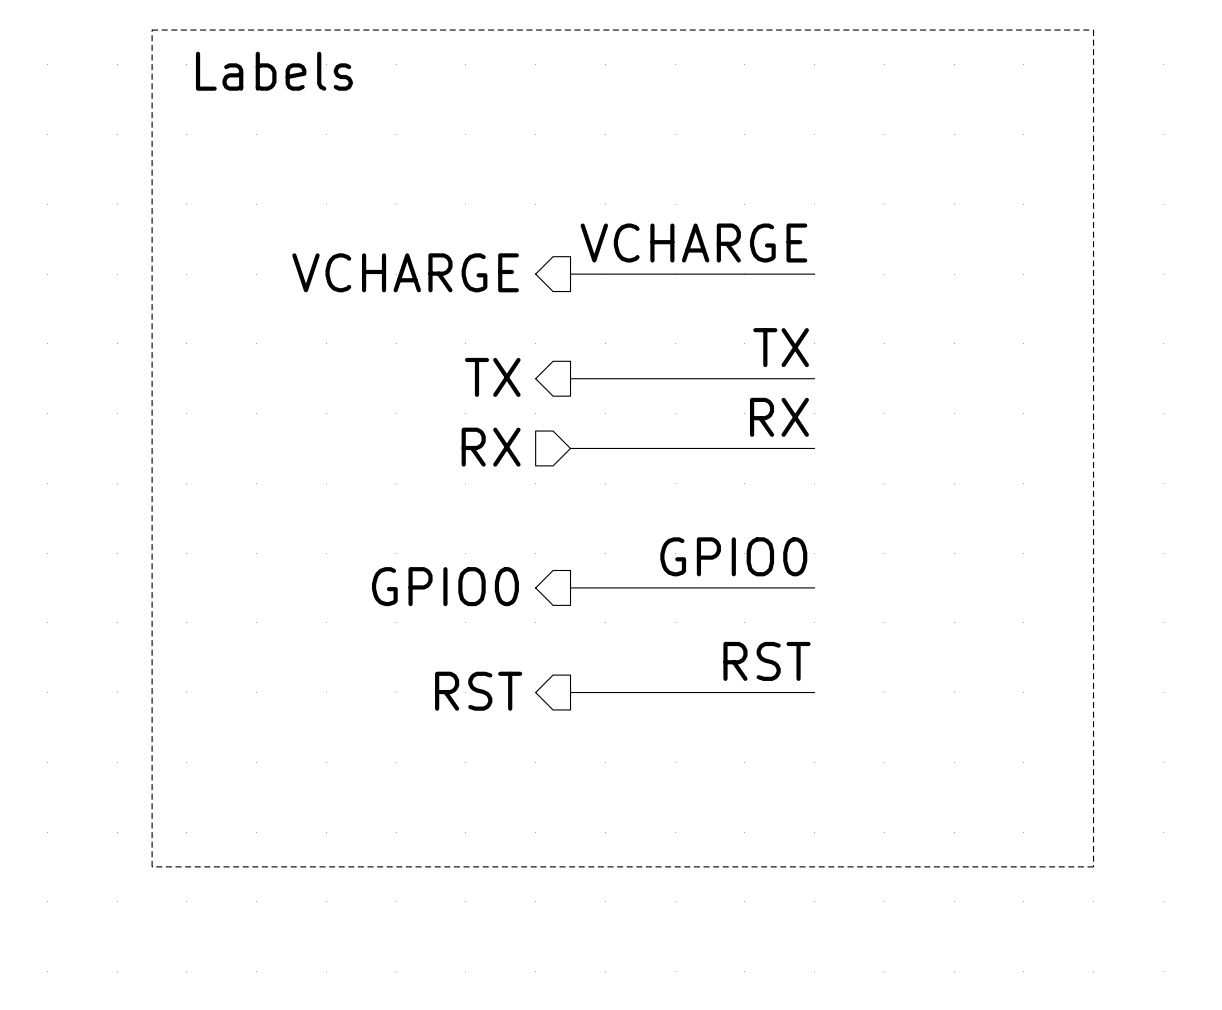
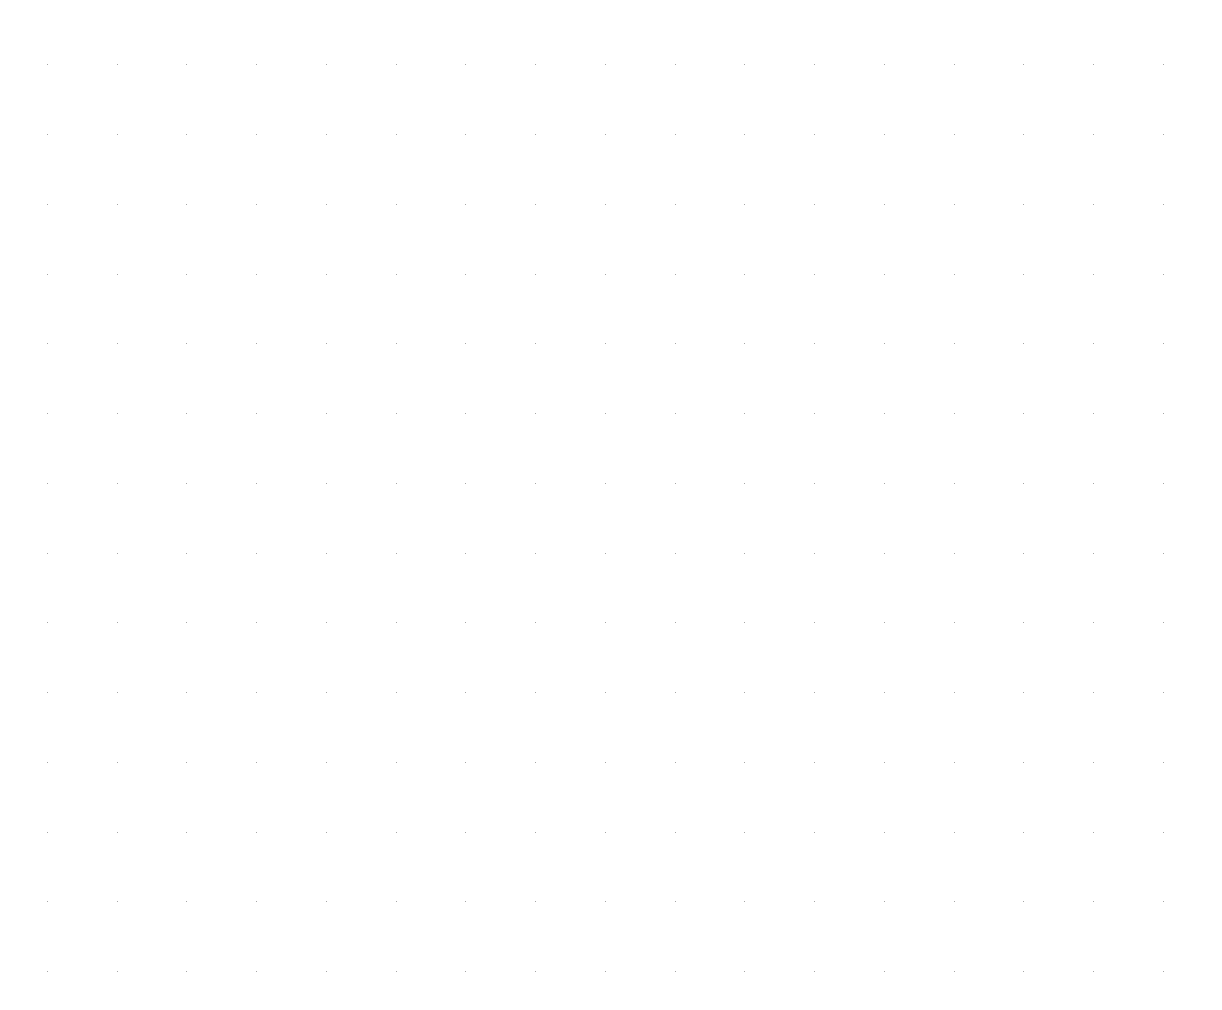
line: (152, 30) (1093, 30) (1093, 866) (152, 866) (152, 30) -> none
text: Labels (274, 71) -> none
label: VCHARGE (693, 243) -> none
hierarchical label: VCHARGE (405, 272) -> none
wire: (570, 274) (814, 274) -> none
label: TX (781, 347) -> none
hierarchical label: TX (492, 377) -> none
wire: (570, 378) (814, 378) -> none
label: RX (779, 417) -> none
hierarchical label: RX (491, 447) -> none
wire: (570, 448) (814, 448) -> none
label: GPIO0 (733, 556) -> none
hierarchical label: GPIO0 (445, 586) -> none
wire: (570, 587) (814, 587) -> none
label: RST (767, 661) -> none
hierarchical label: RST (478, 691) -> none
wire: (570, 692) (814, 692) -> none

